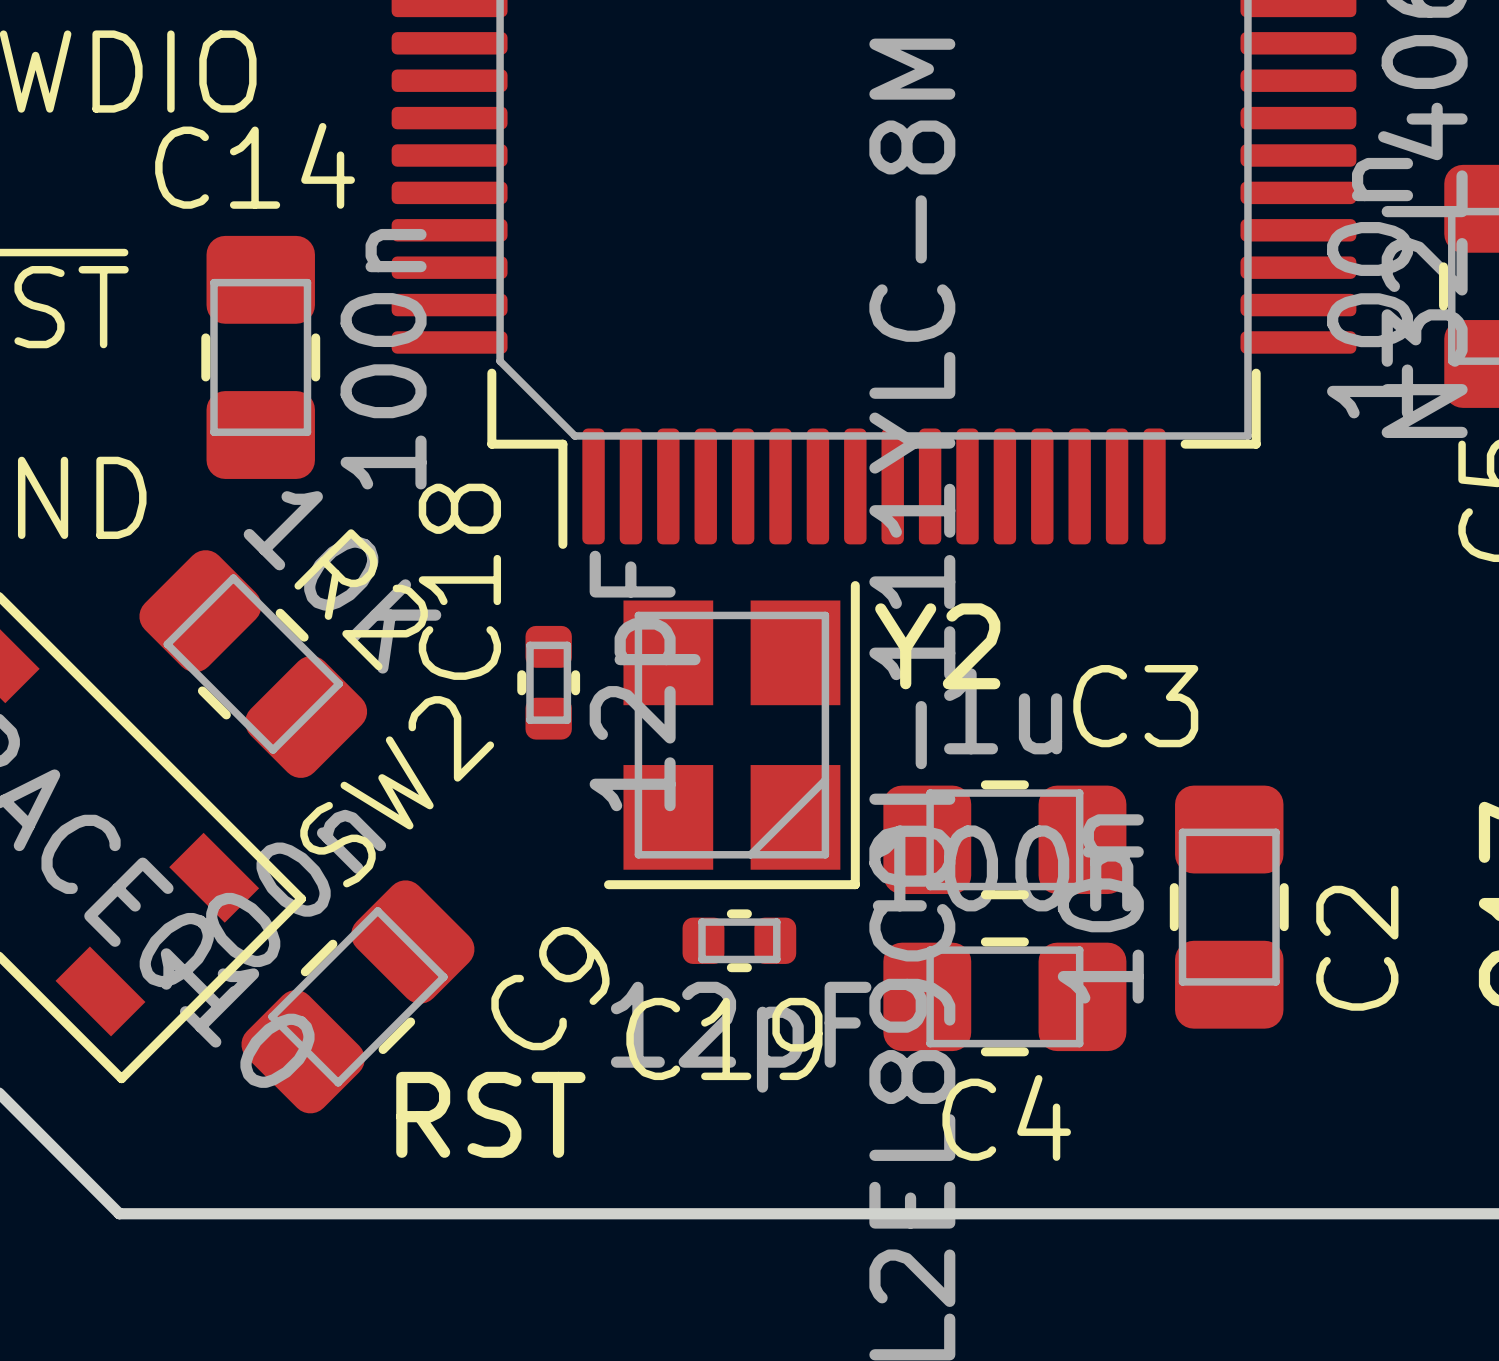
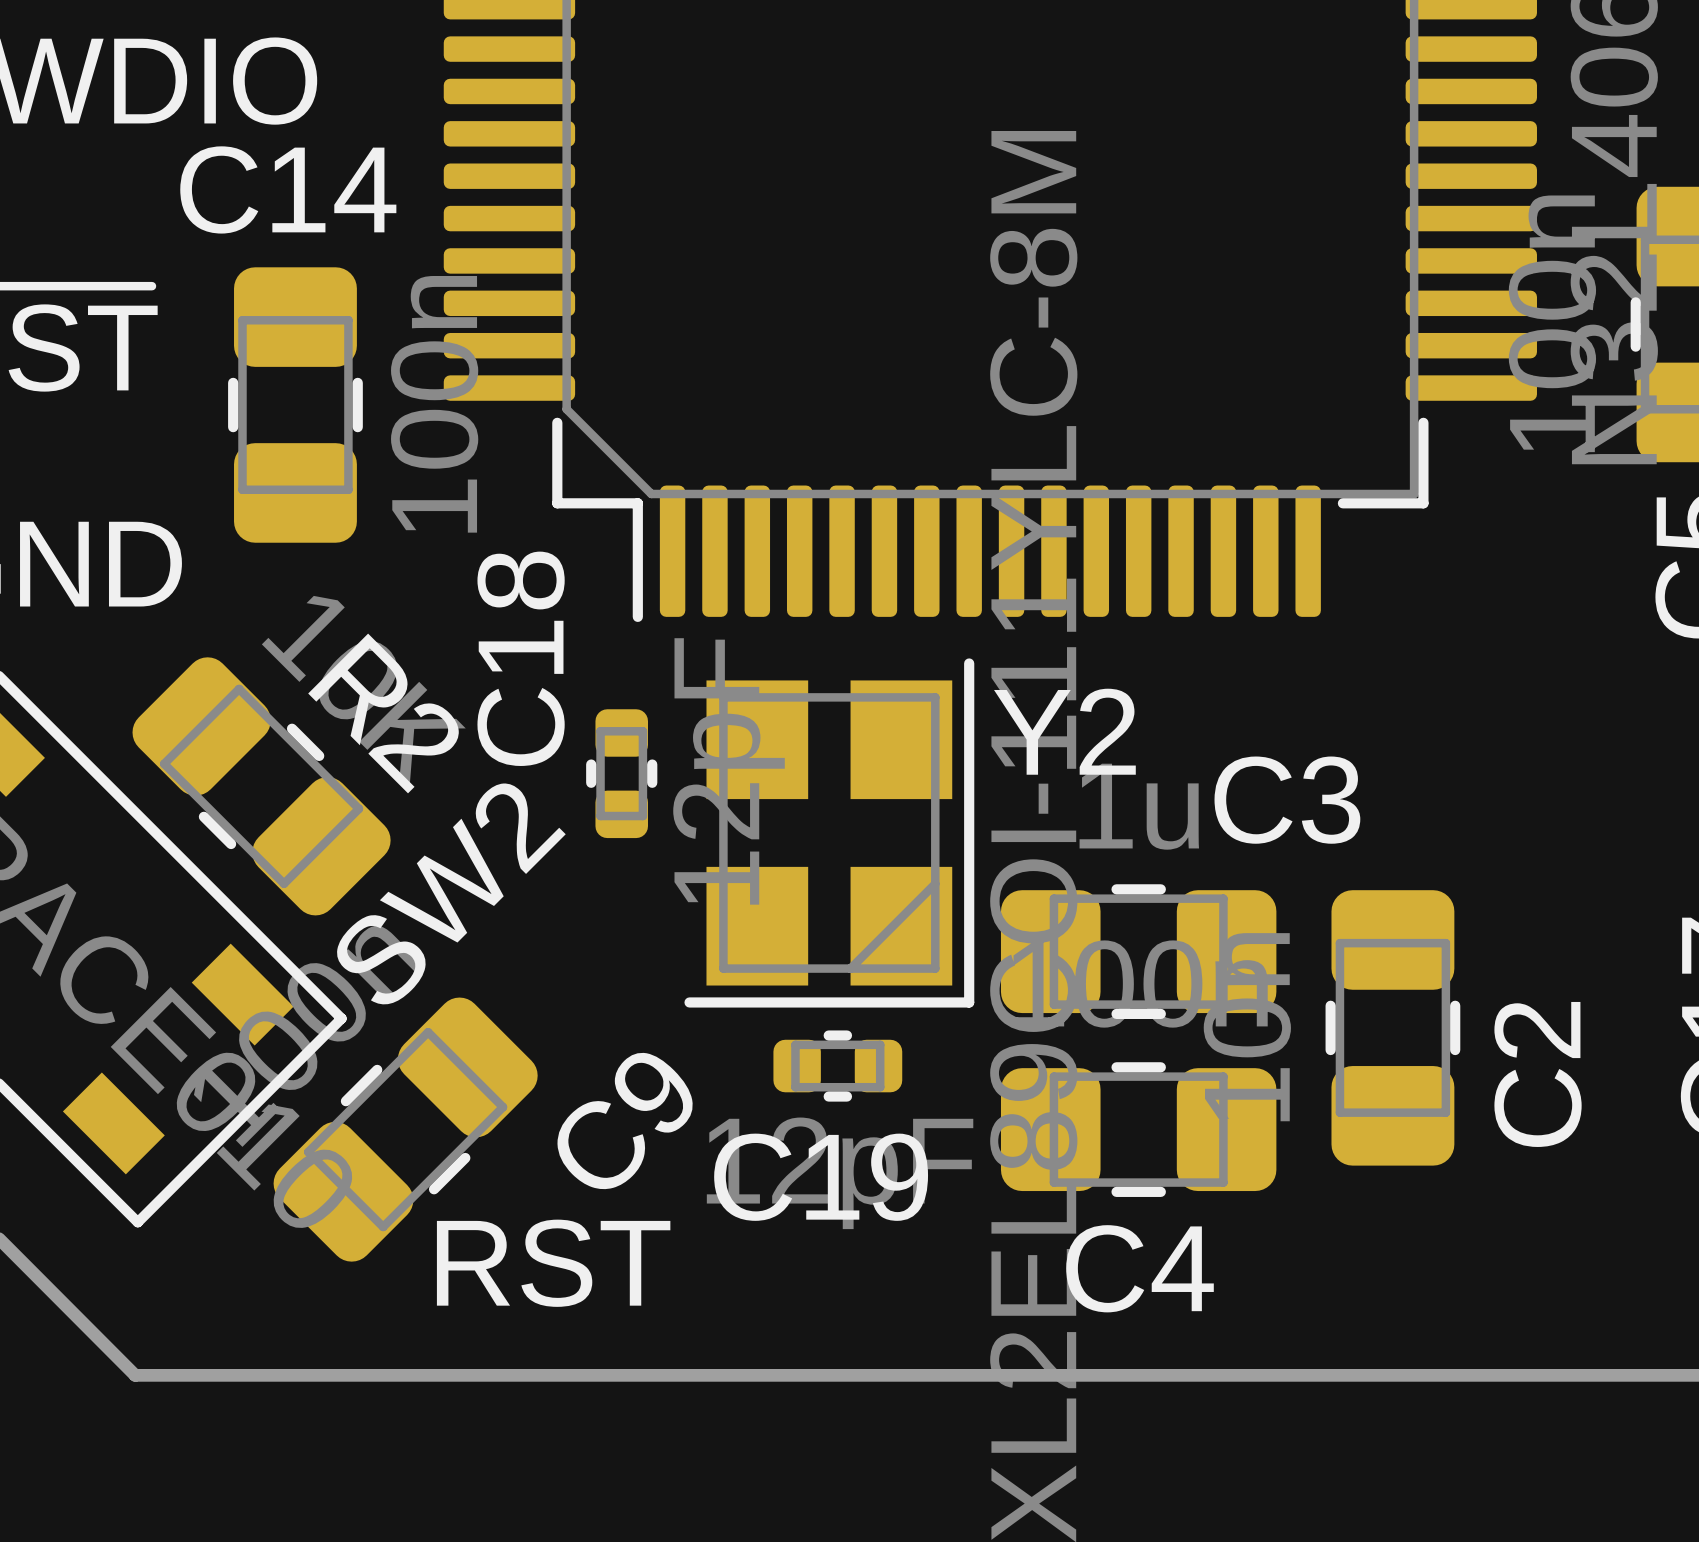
R2 position: (253, 664) -> (261, 786)

